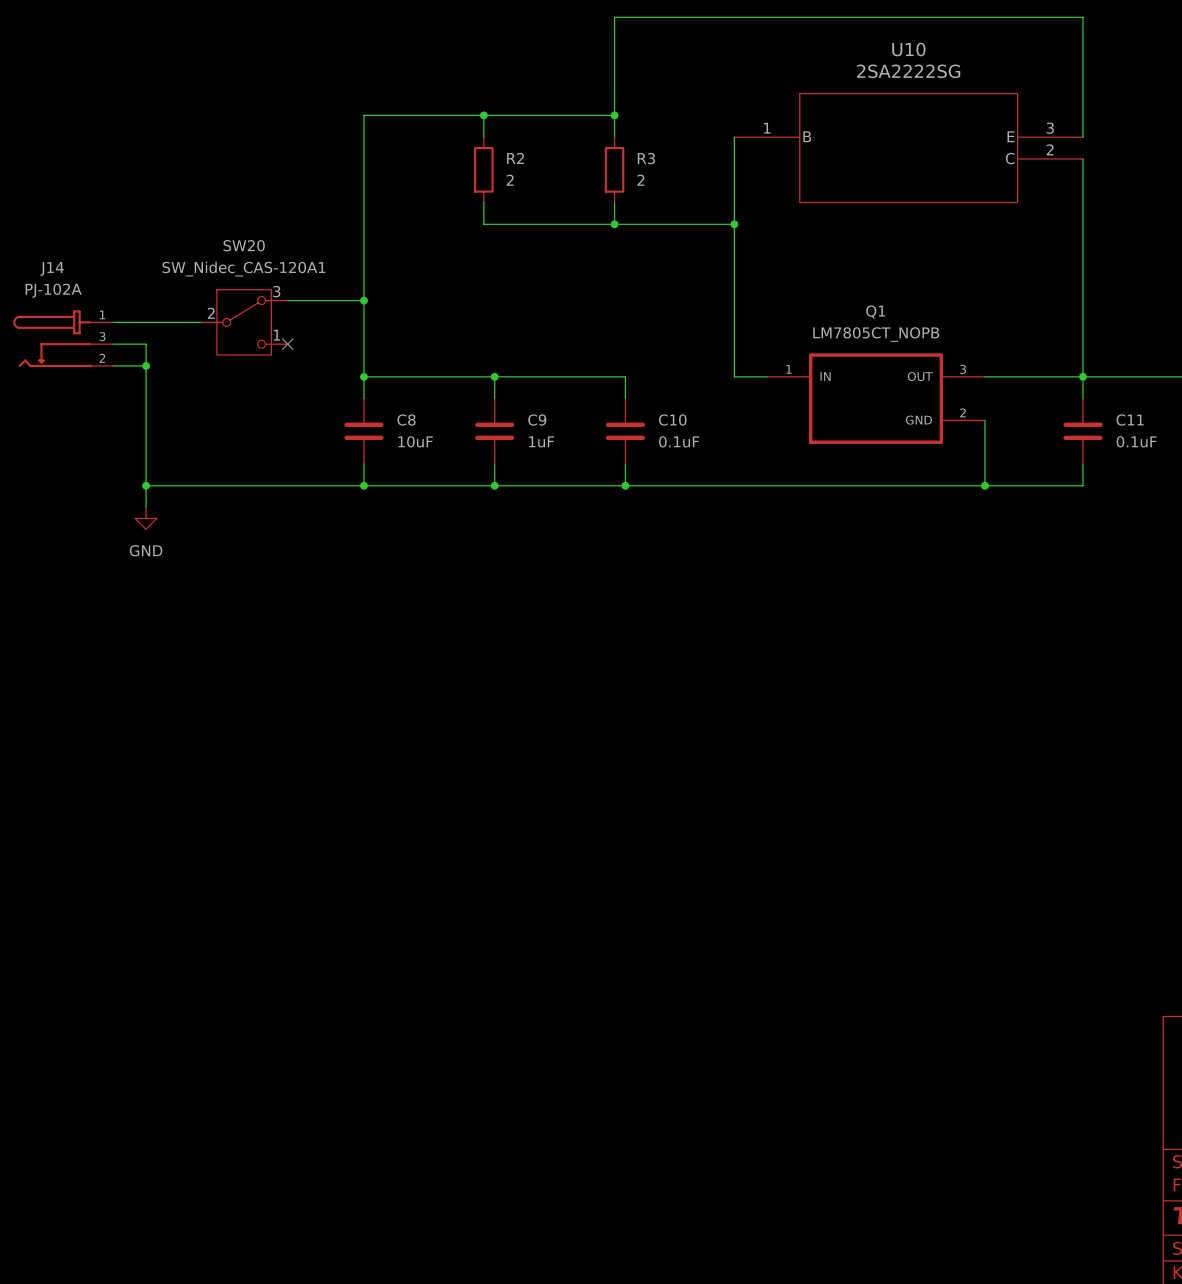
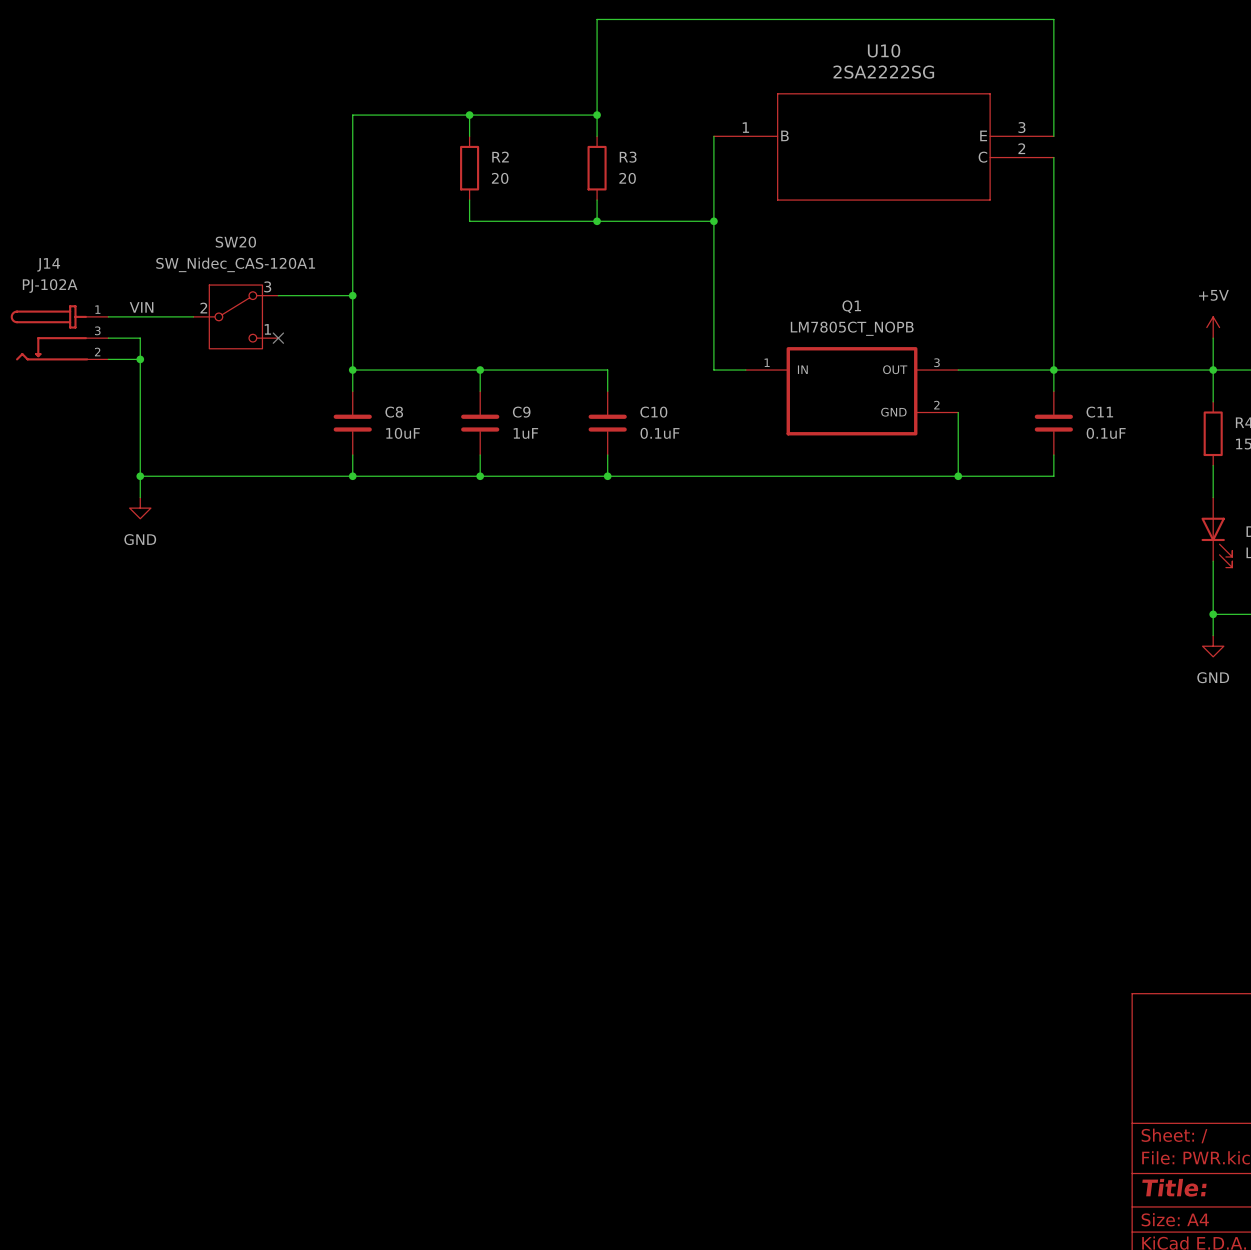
R2 value: 2 (510, 180) -> 20 (500, 178)
R3 value: 2 (640, 180) -> 20 (627, 178)
label: none -> VIN (141, 307)

